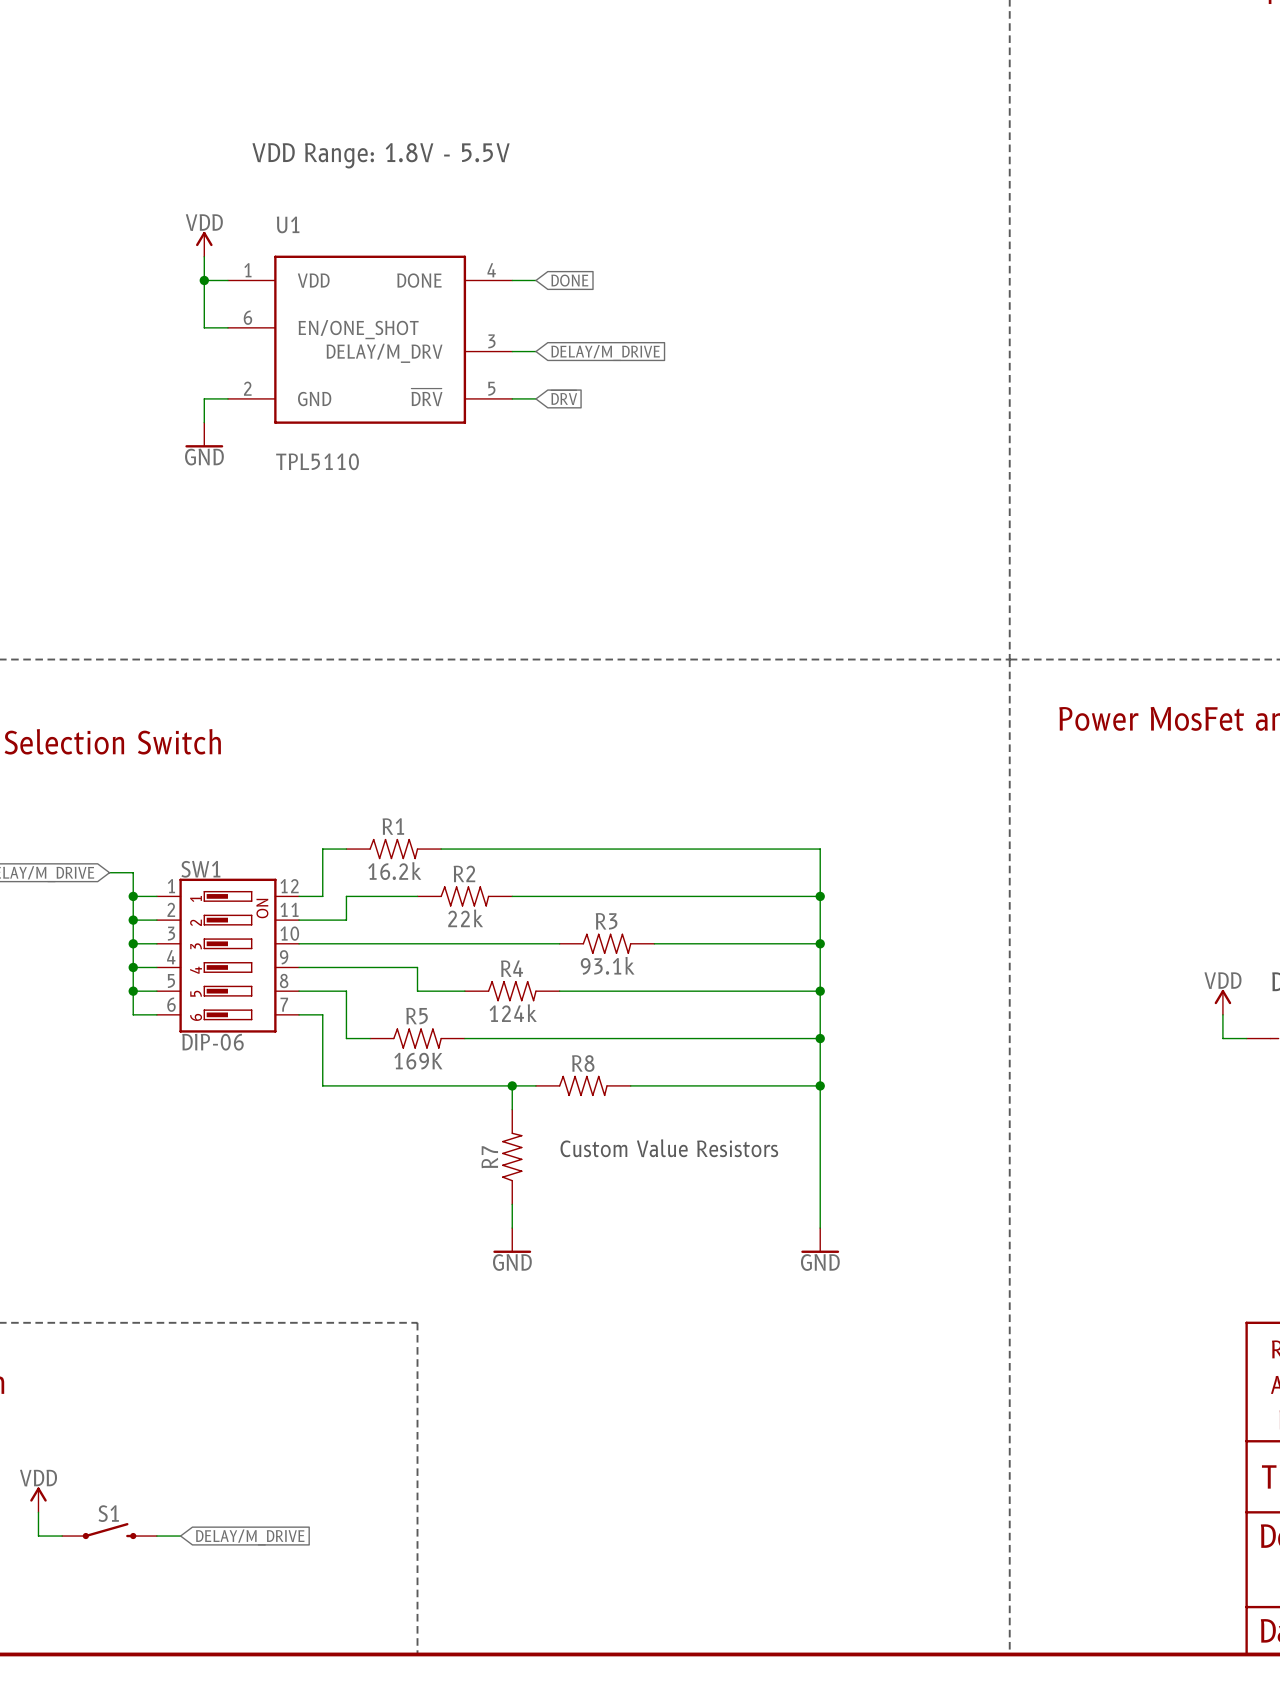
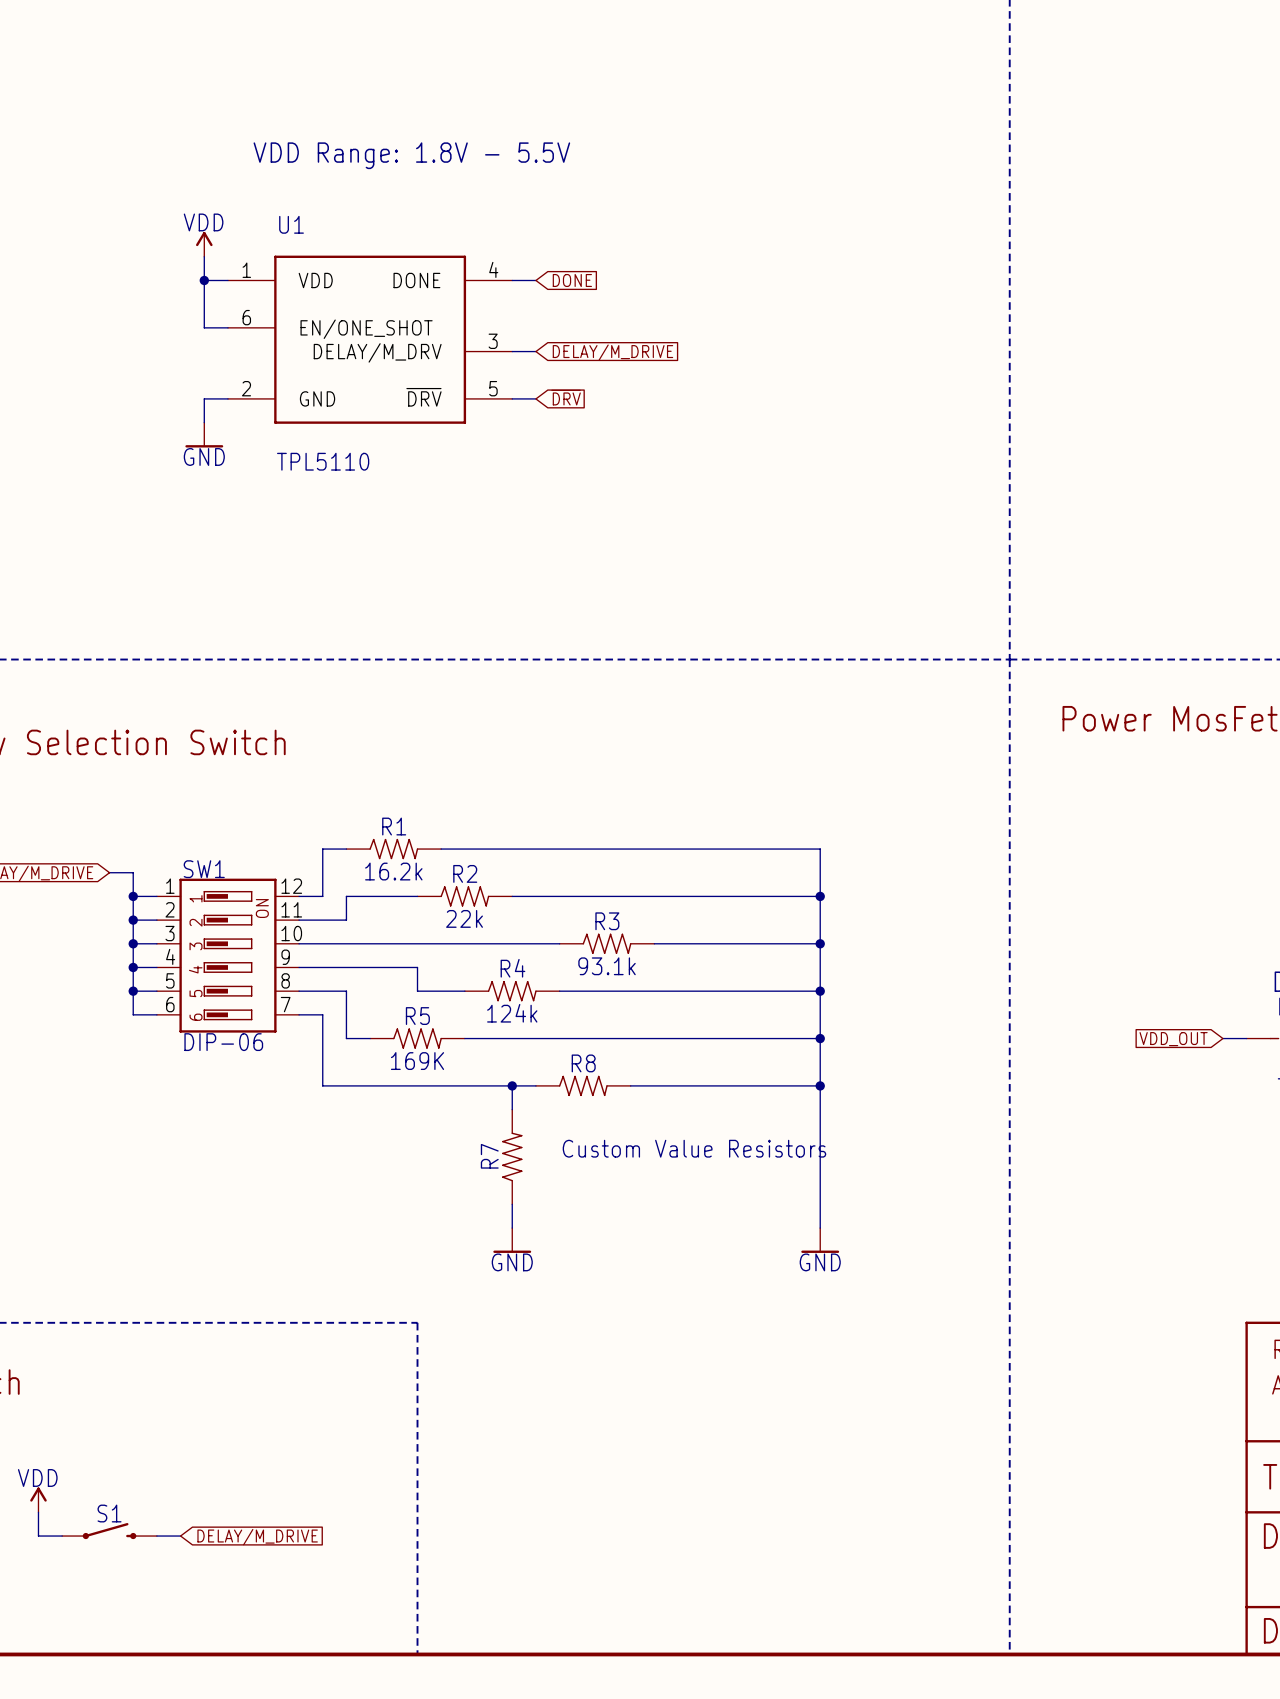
power symbol: VDD (1222, 1002) -> none
wire: (1222, 1014) (1222, 1038) -> none
global label: none -> VDD_OUT (1173, 1039)

